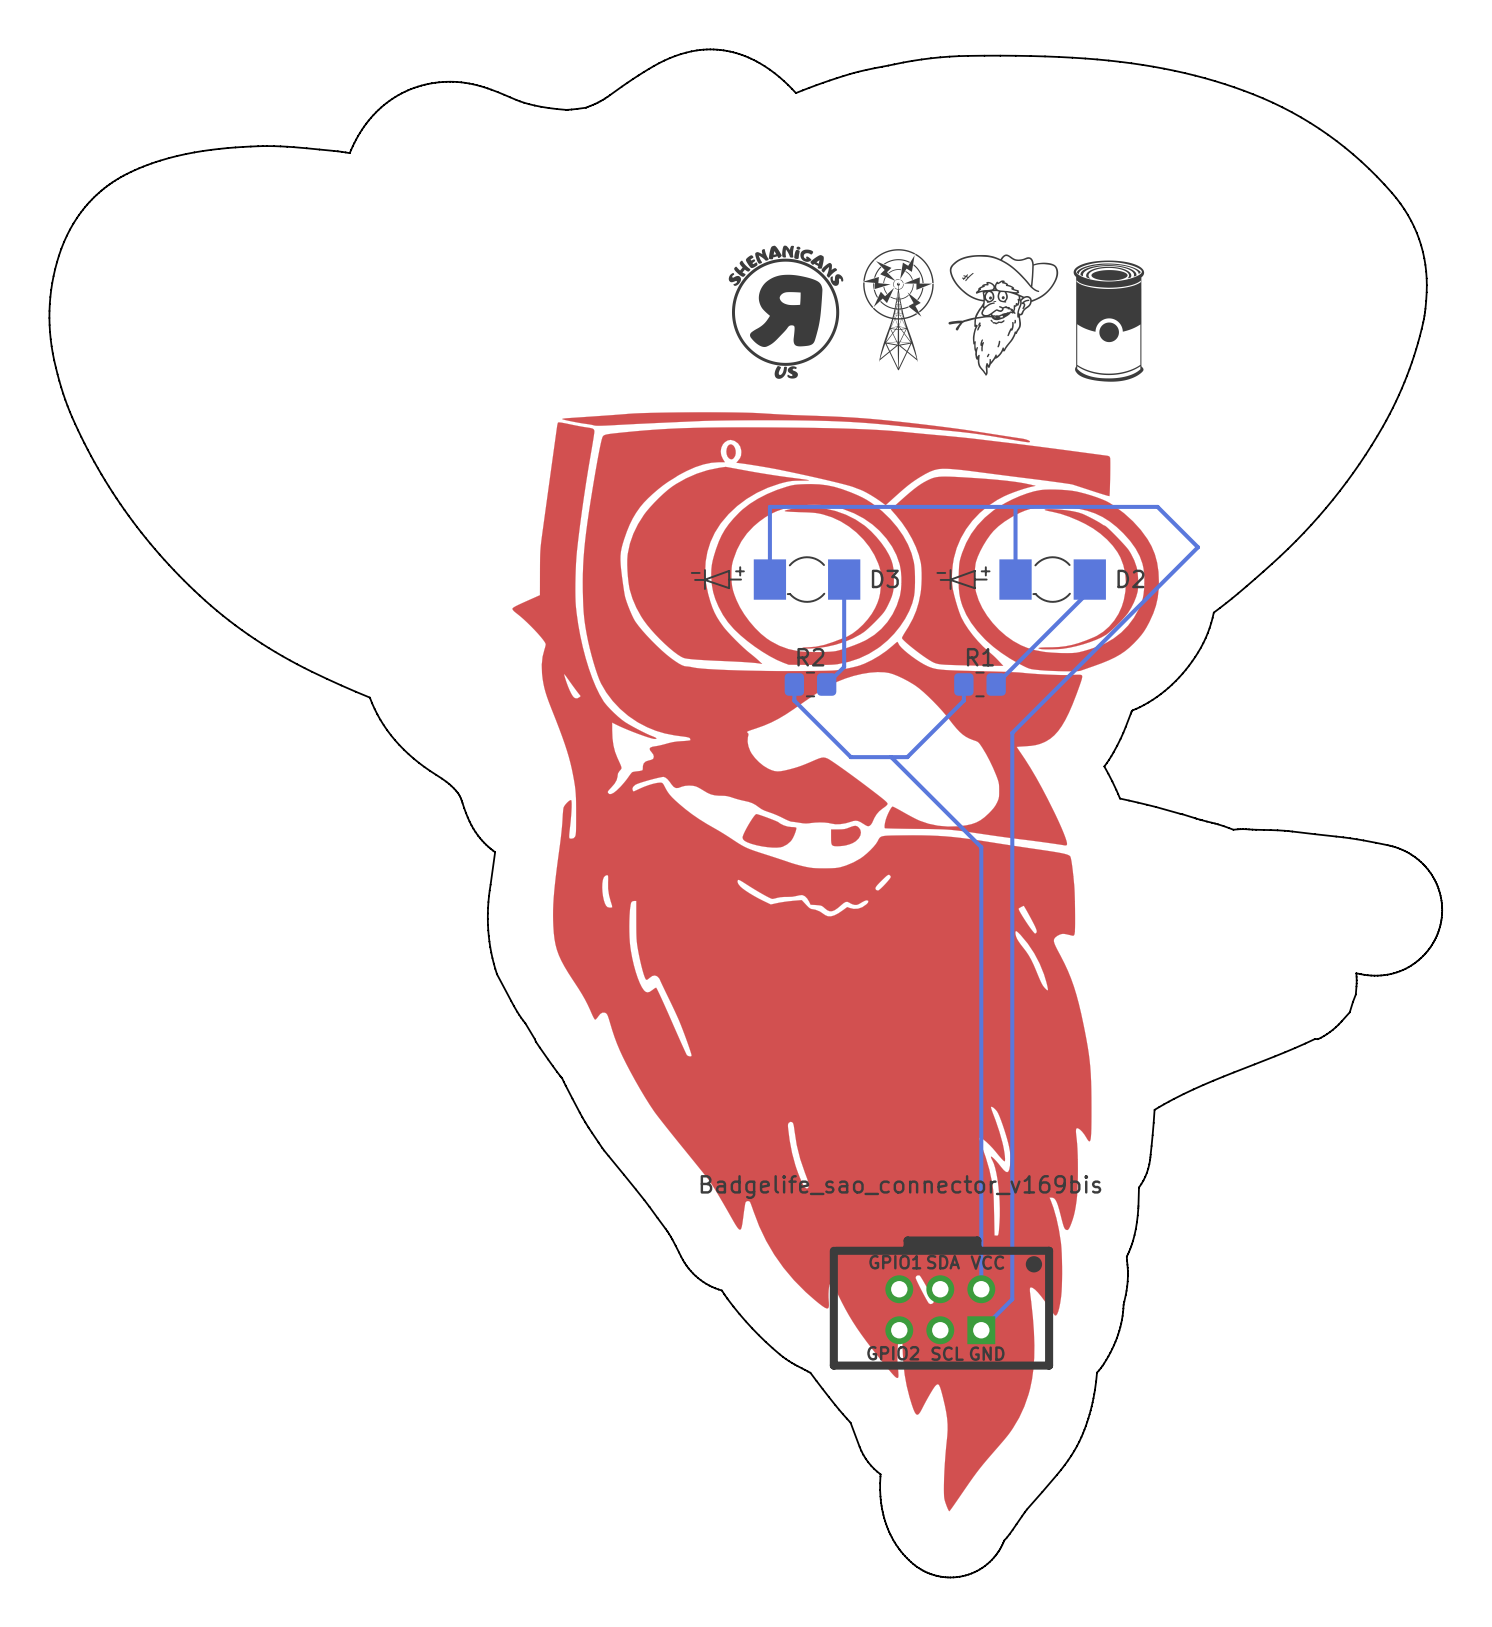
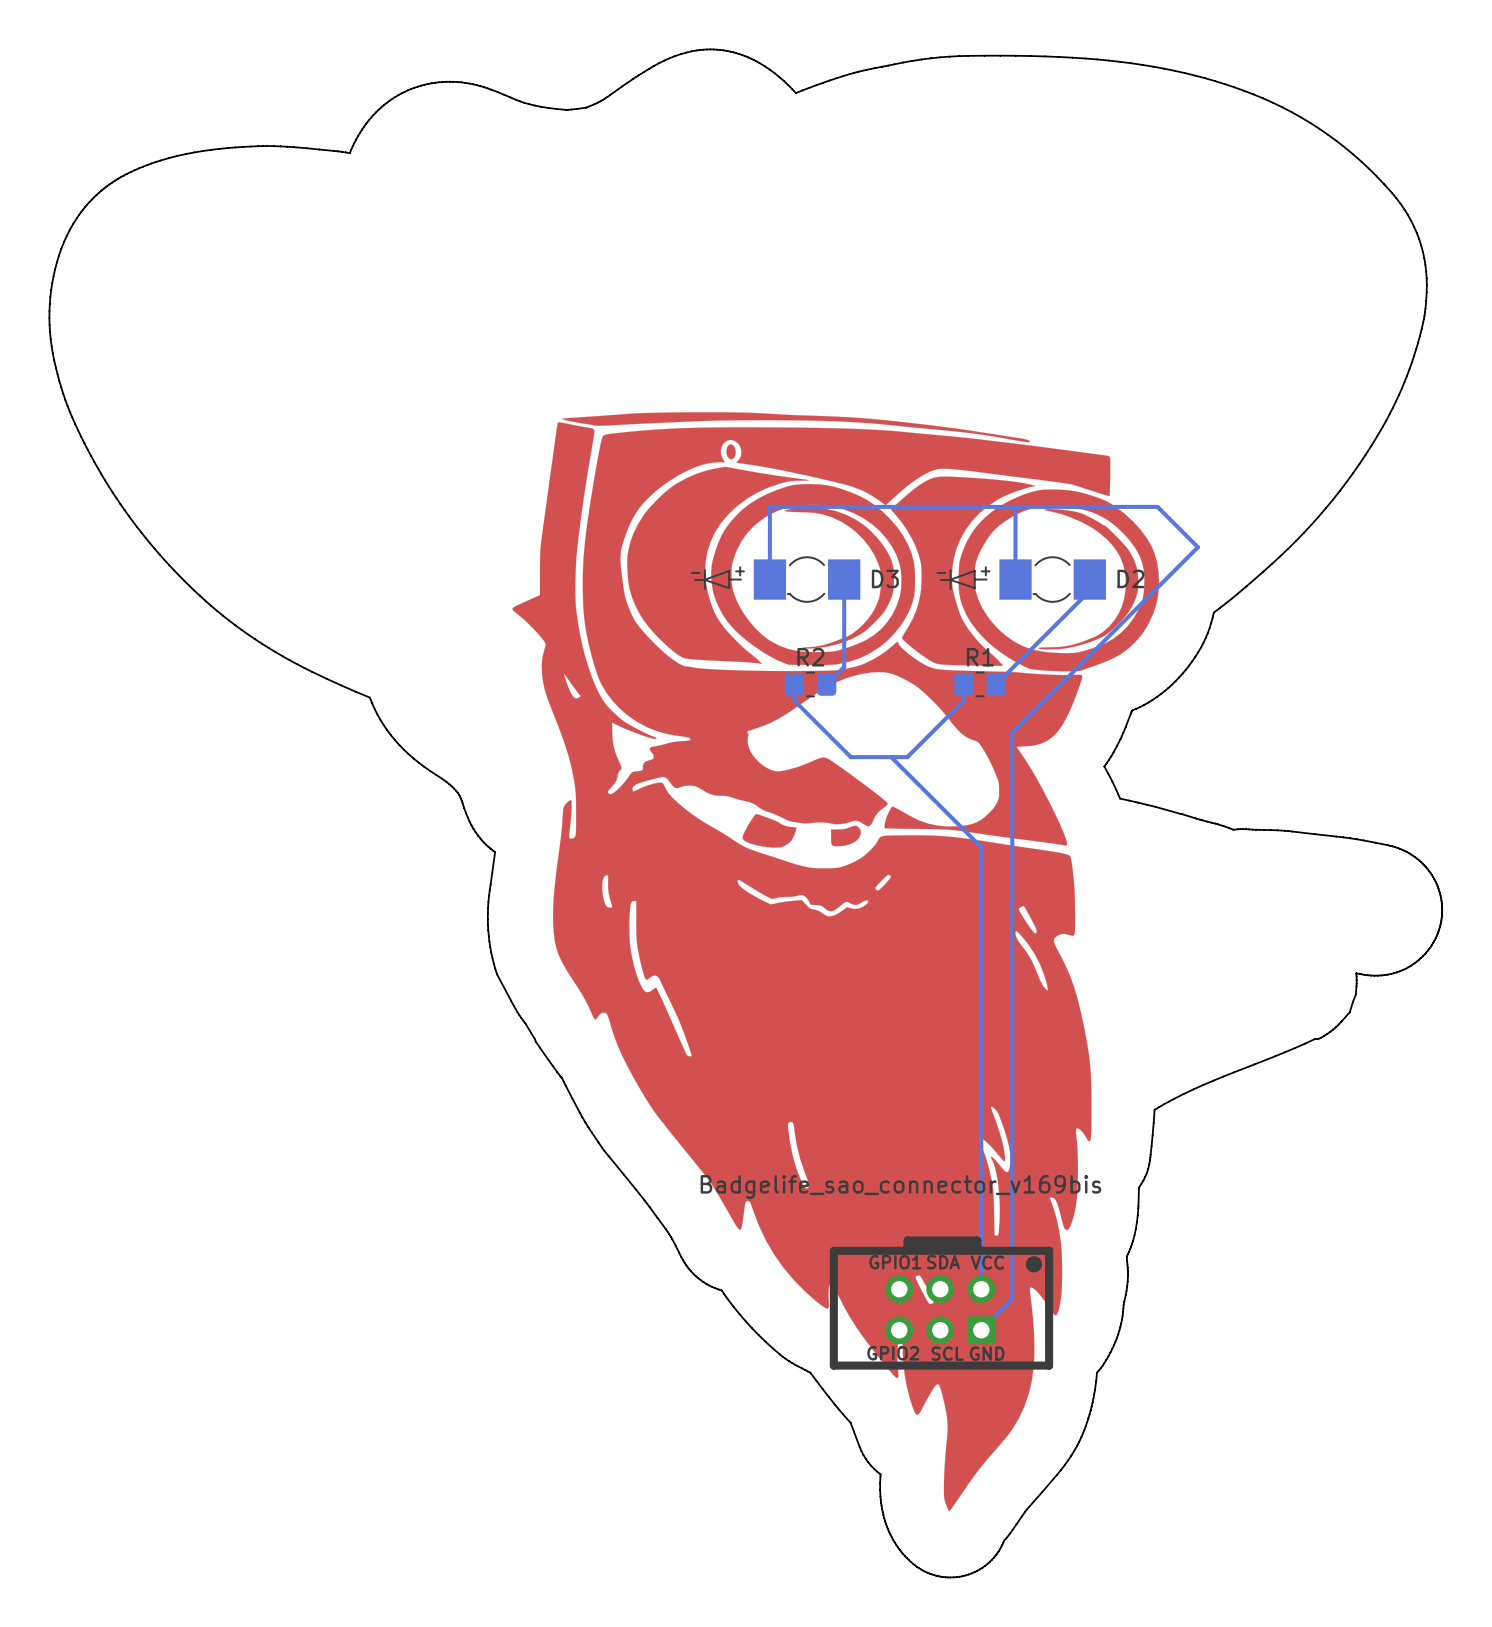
drawing: [728, 245, 844, 379] -> none
drawing: [862, 249, 1145, 382] -> none

